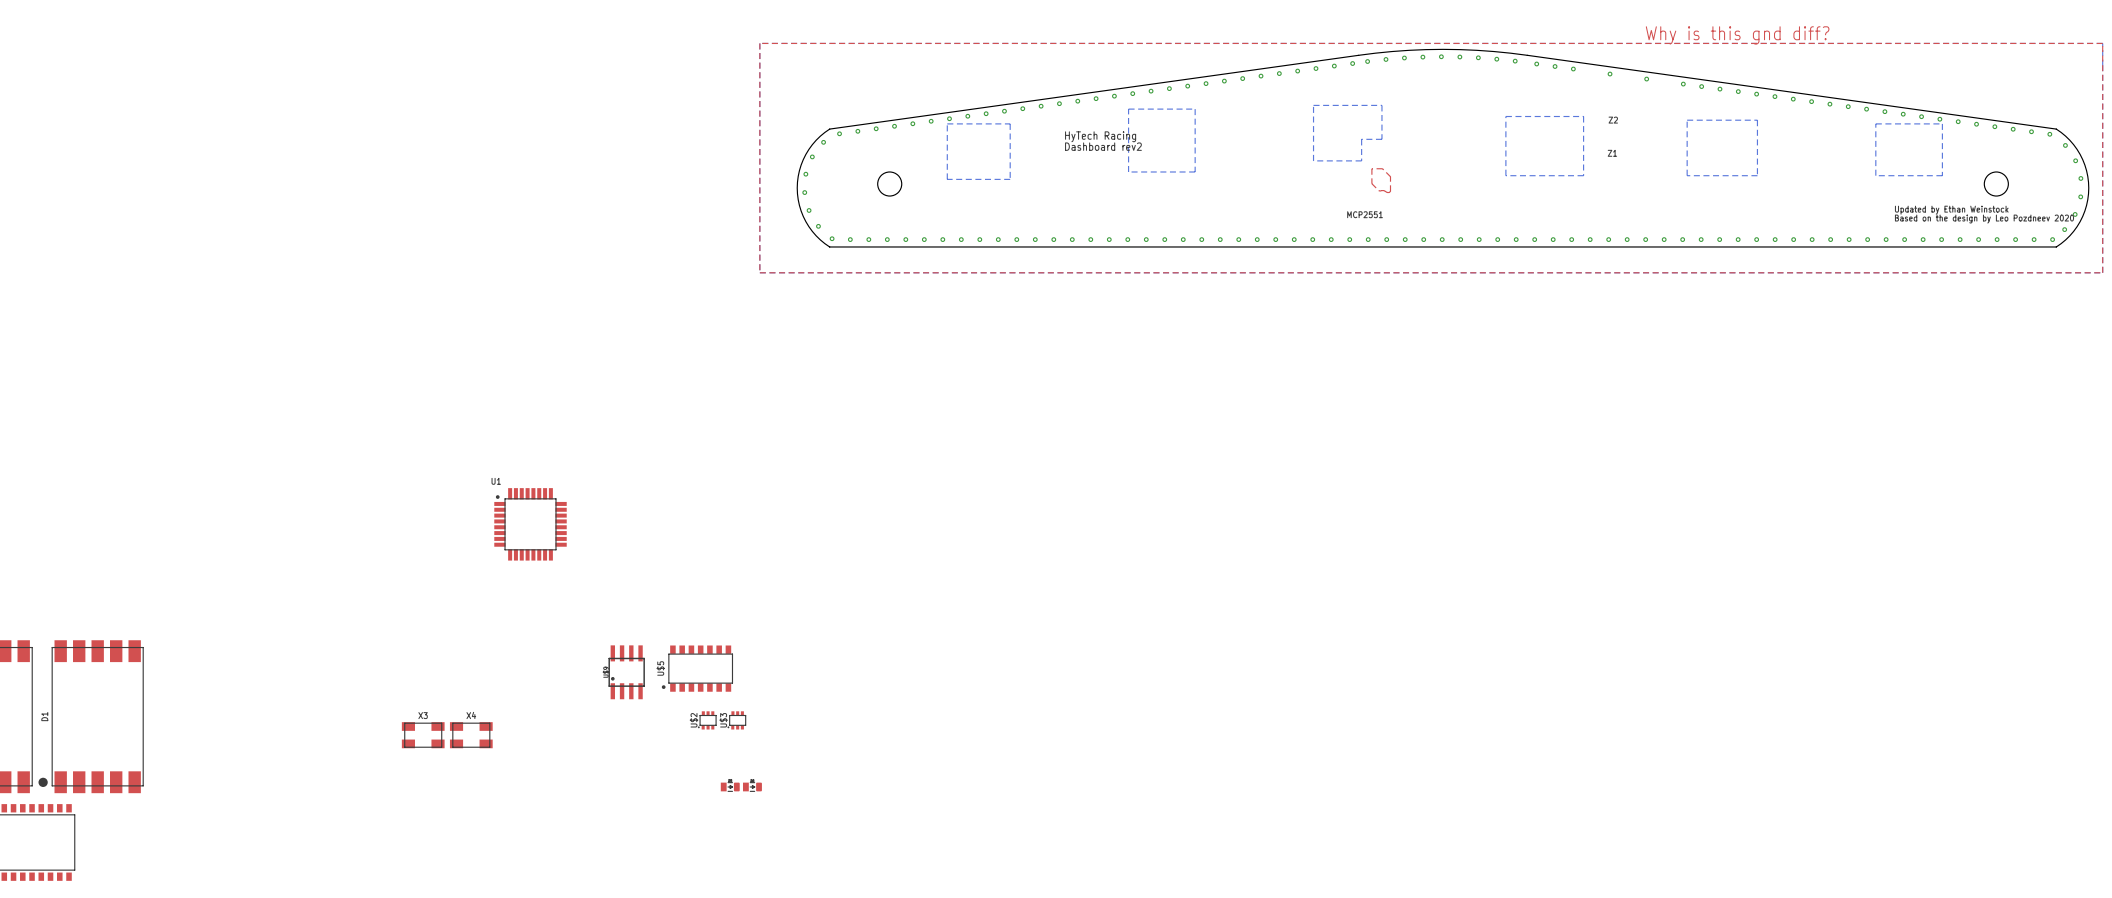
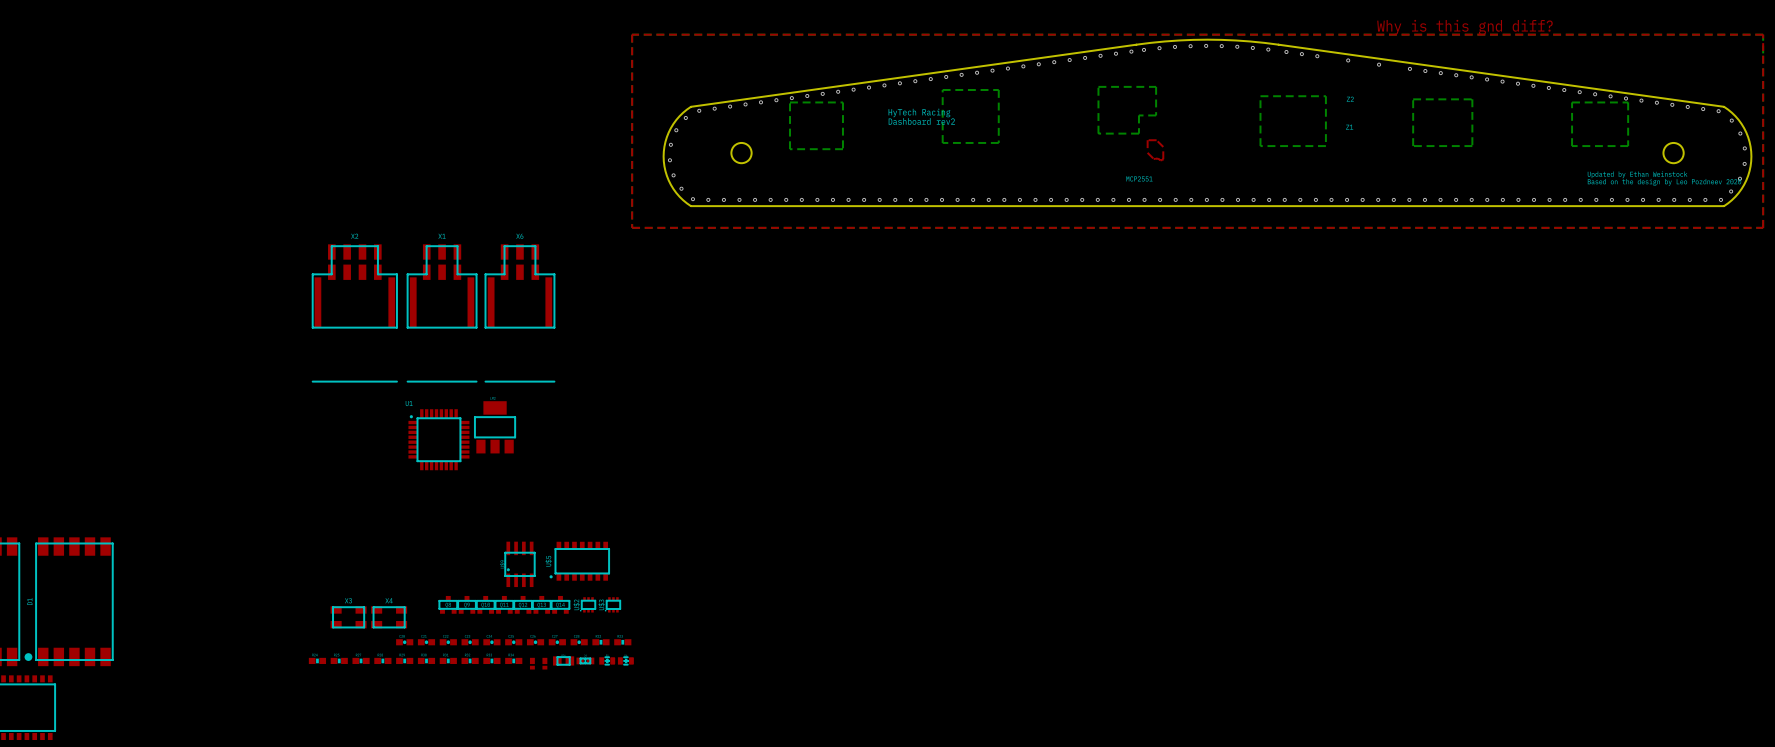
part: none -> (354, 313)
part: none -> (442, 313)
part: none -> (519, 313)
part: none -> (495, 427)
part: none -> (448, 604)
part: none -> (467, 604)
part: none -> (485, 604)
part: none -> (504, 604)
part: none -> (523, 604)
part: none -> (541, 604)
part: none -> (560, 604)
part: none -> (404, 642)
part: none -> (426, 642)
part: none -> (448, 642)
part: none -> (470, 642)
part: none -> (491, 642)
part: none -> (513, 642)
part: none -> (535, 642)
part: none -> (557, 642)
part: none -> (579, 642)
part: none -> (600, 642)
part: none -> (622, 642)
part: none -> (317, 660)
part: none -> (339, 660)
part: none -> (361, 660)
part: none -> (382, 660)
part: none -> (404, 660)
part: none -> (426, 660)
part: none -> (448, 660)
part: none -> (470, 660)
part: none -> (491, 660)
part: none -> (513, 660)
part: none -> (563, 660)
part: none -> (585, 660)
part: none -> (532, 663)
part: none -> (544, 663)

